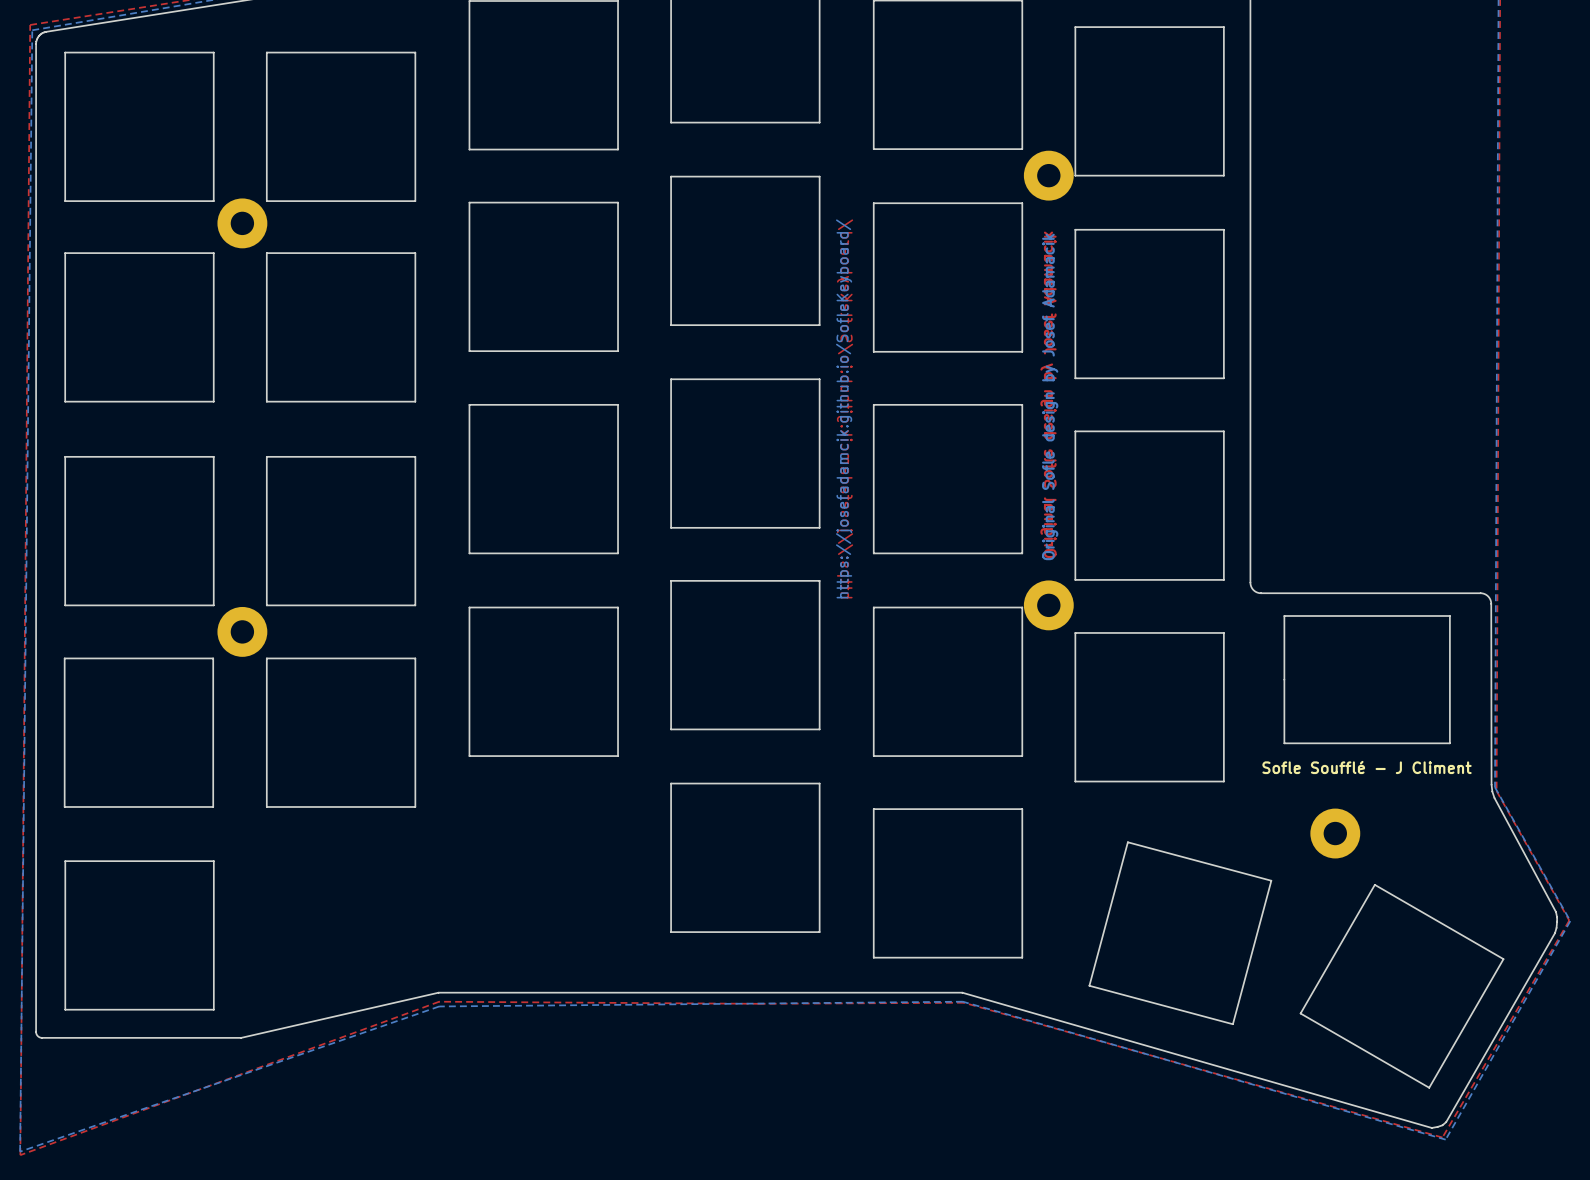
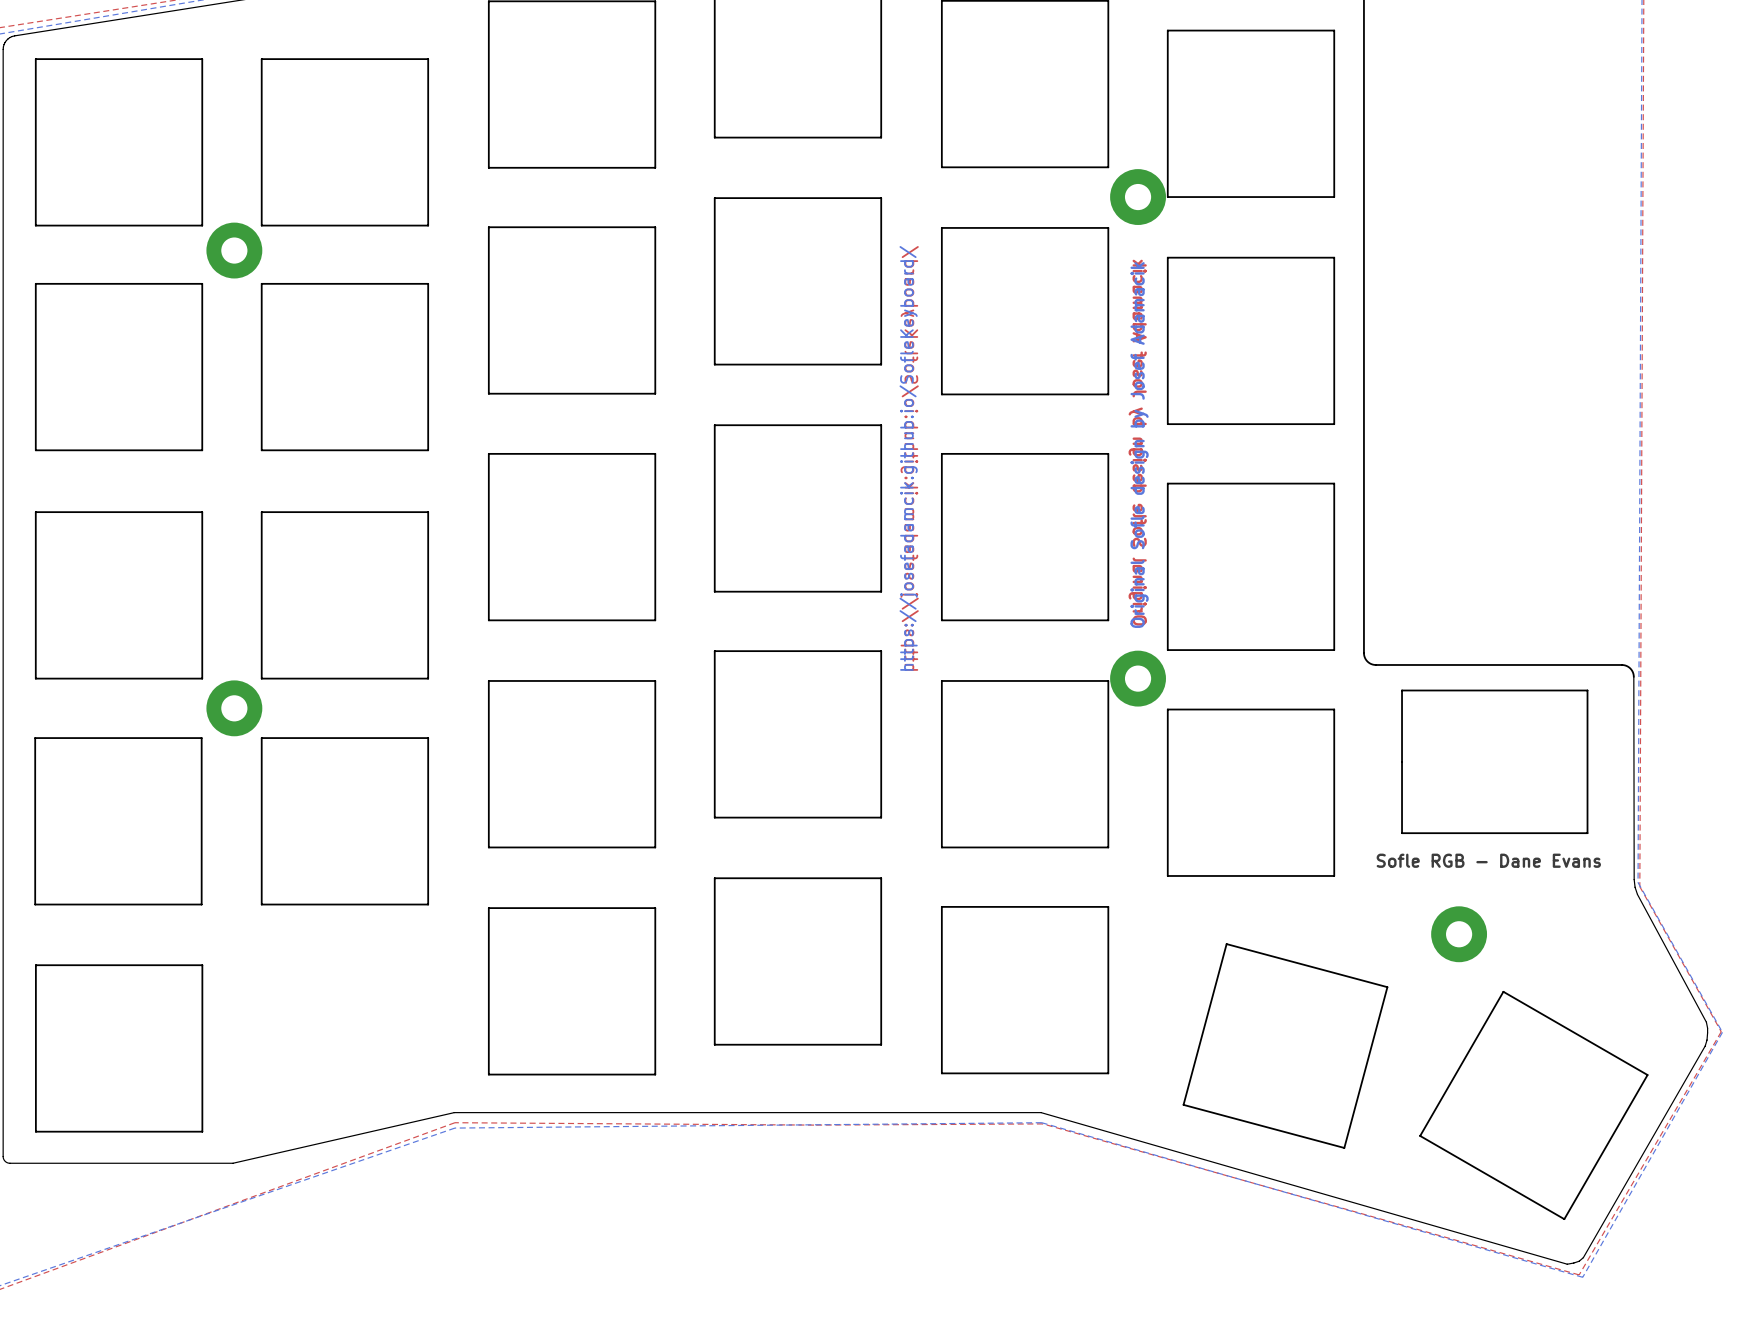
text: Sofle Soufflé - J Climent (1367, 767) -> Sofle RGB - Dane Evans (1488, 860)
board edge: none -> (655, 908) (488, 908) (488, 1074) (655, 1074) (655, 908)

